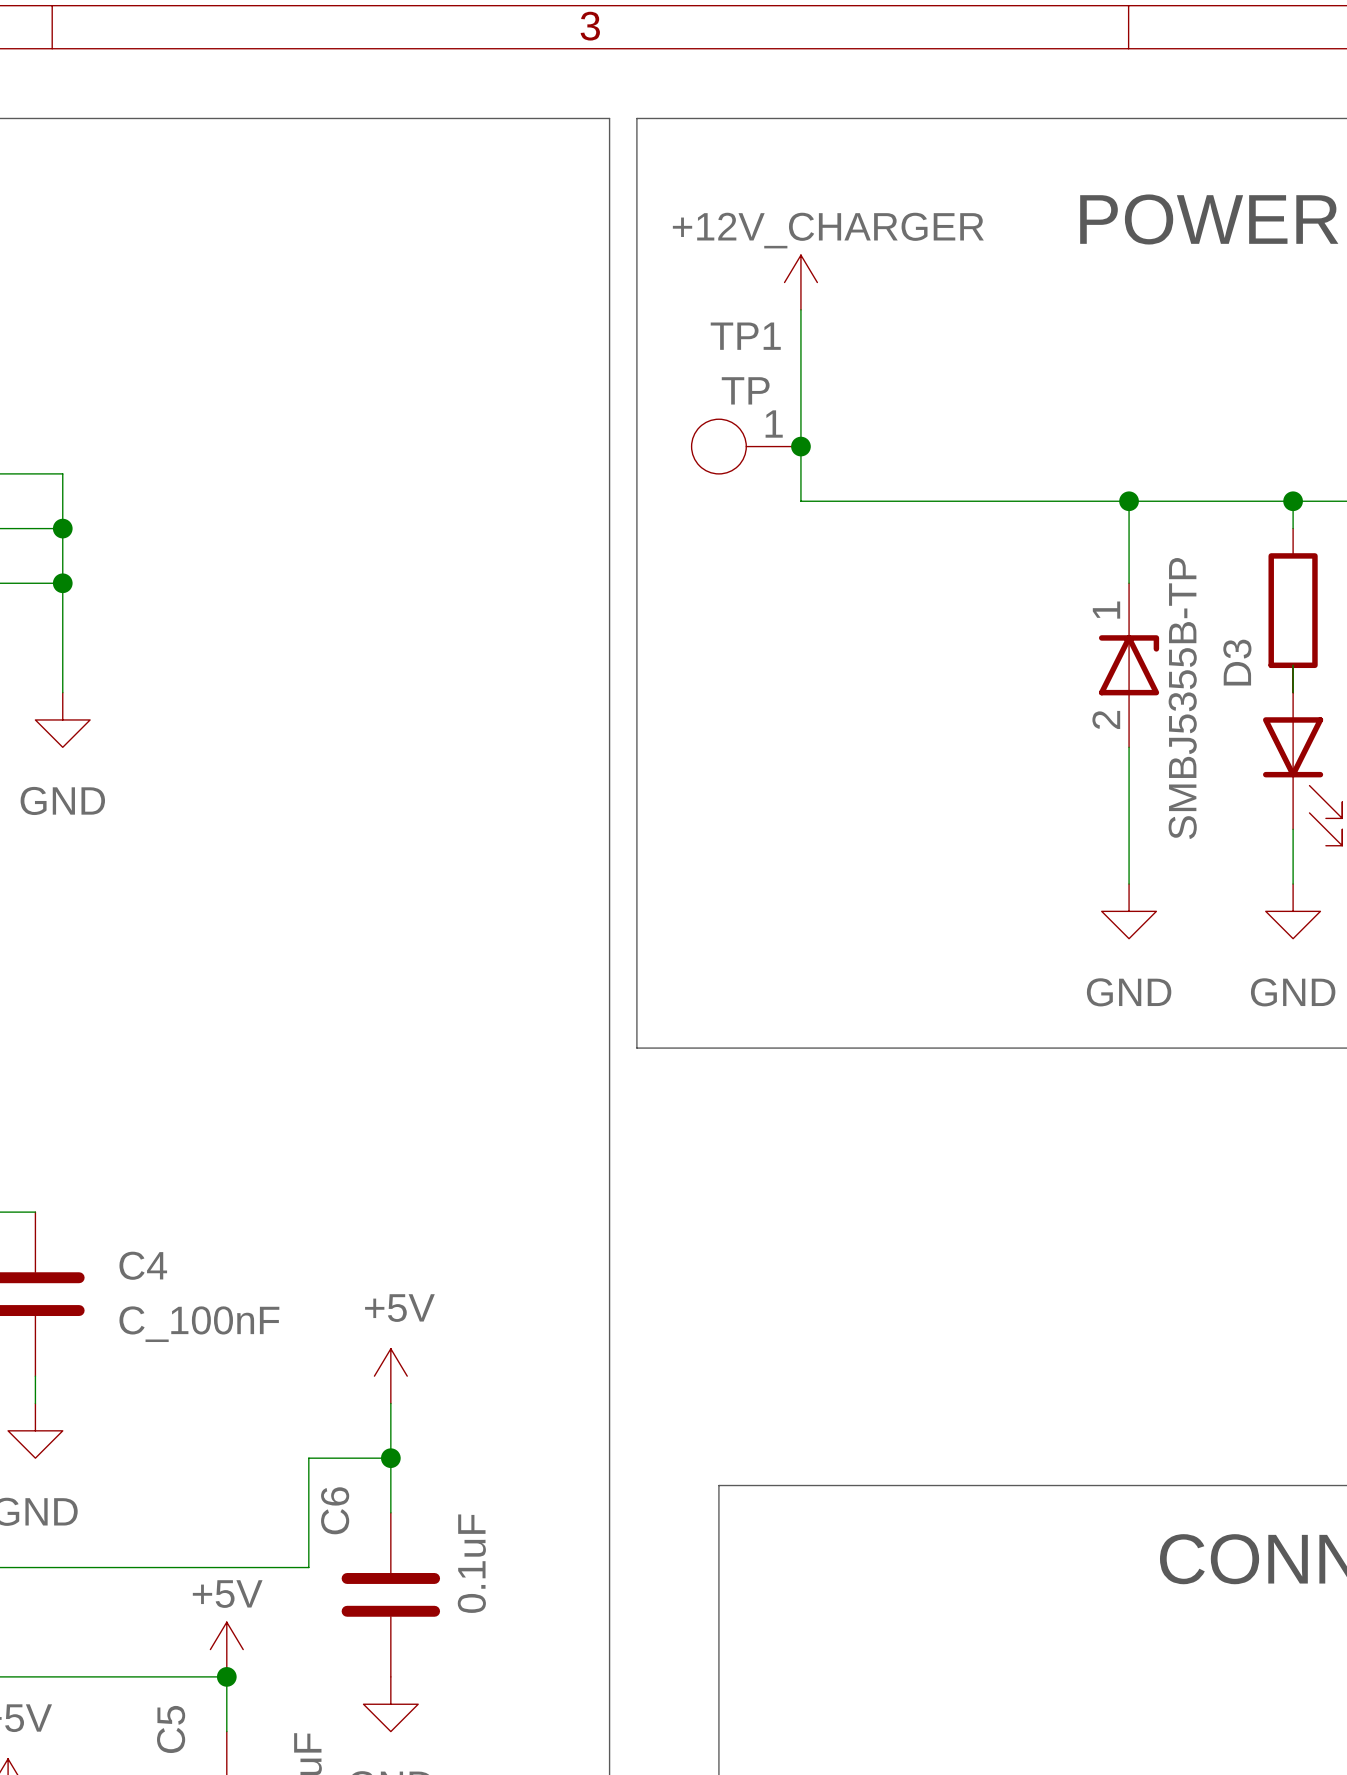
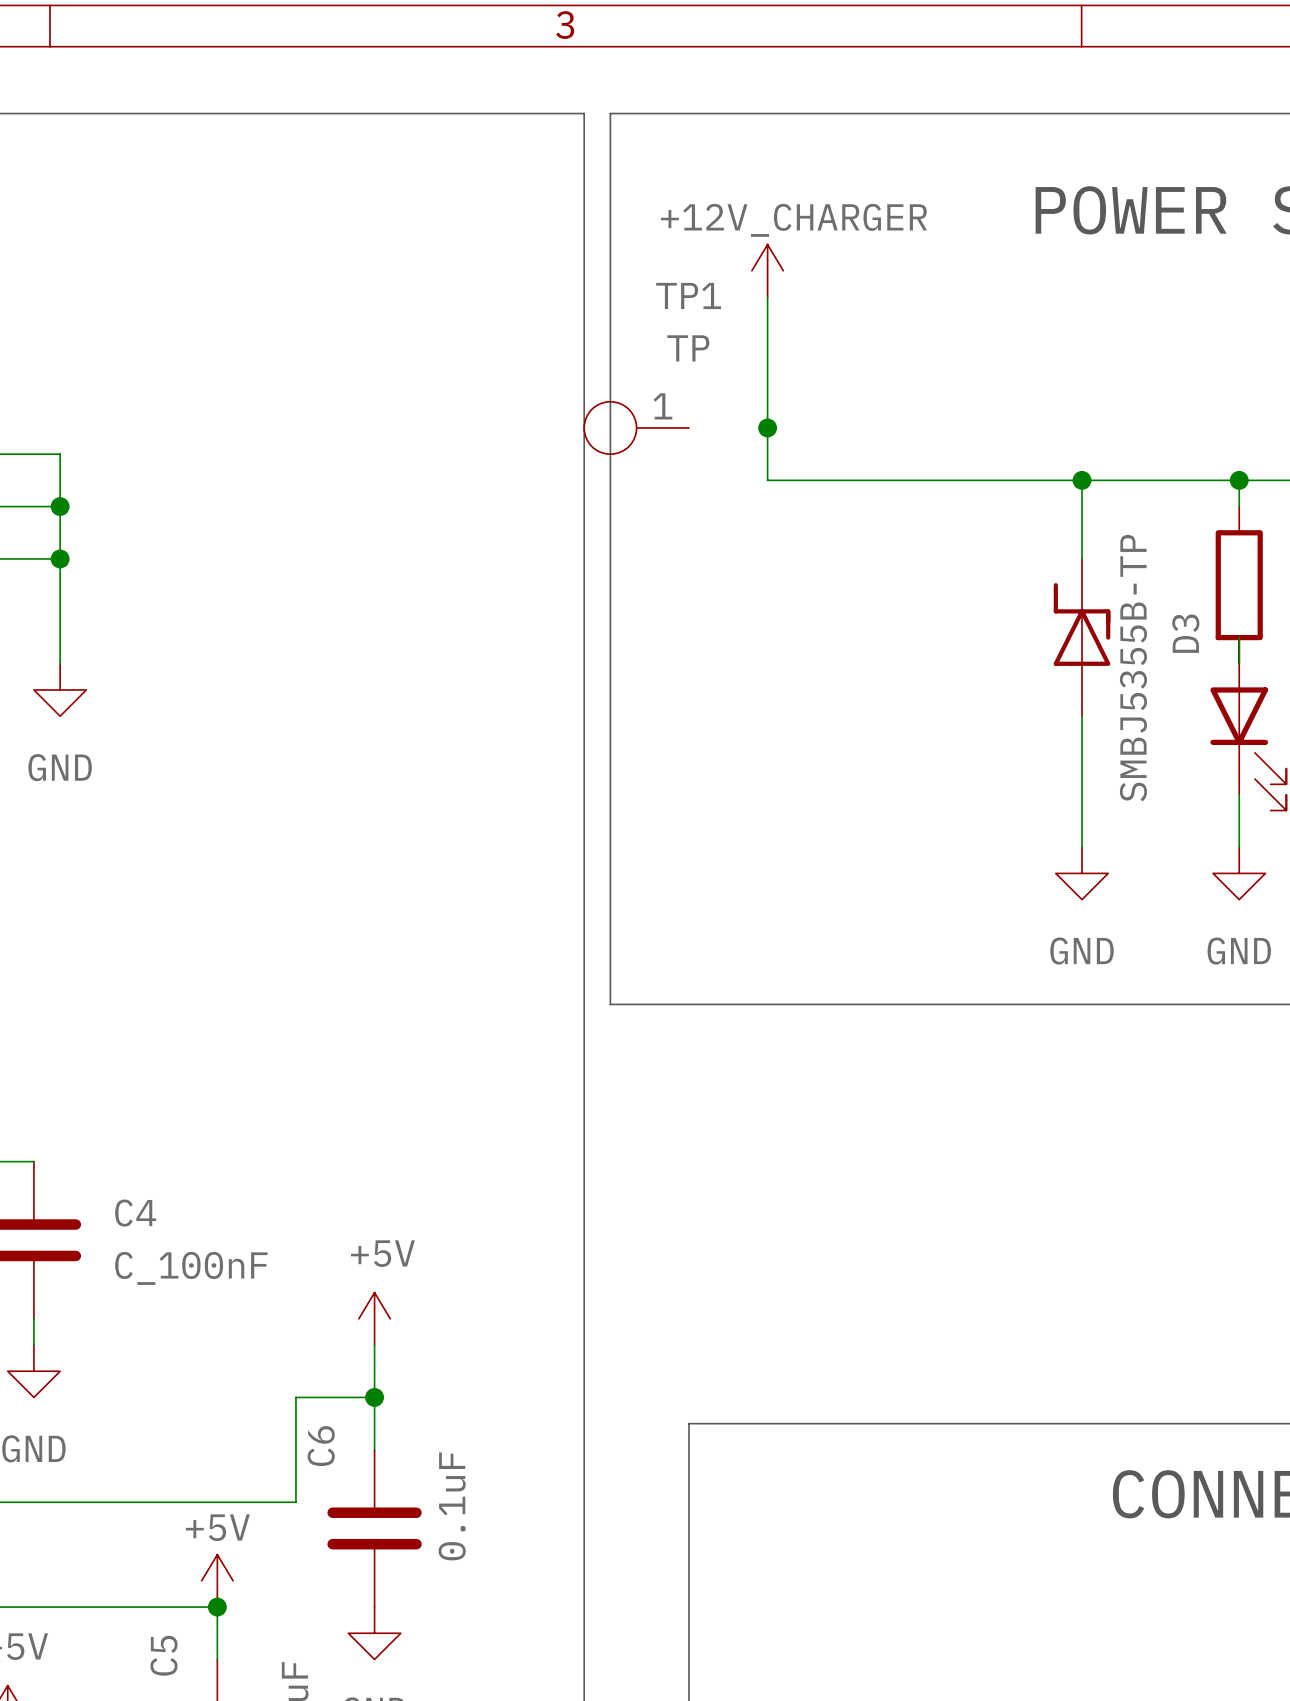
TP1 name position: TP1 (745, 336) -> TP1 (688, 295)
TP1 value position: TP (745, 390) -> TP (688, 348)
TP1 position: (746, 446) -> (636, 427)
D3 symbol: [1098, 583, 1160, 748] -> [1053, 558, 1111, 717]

